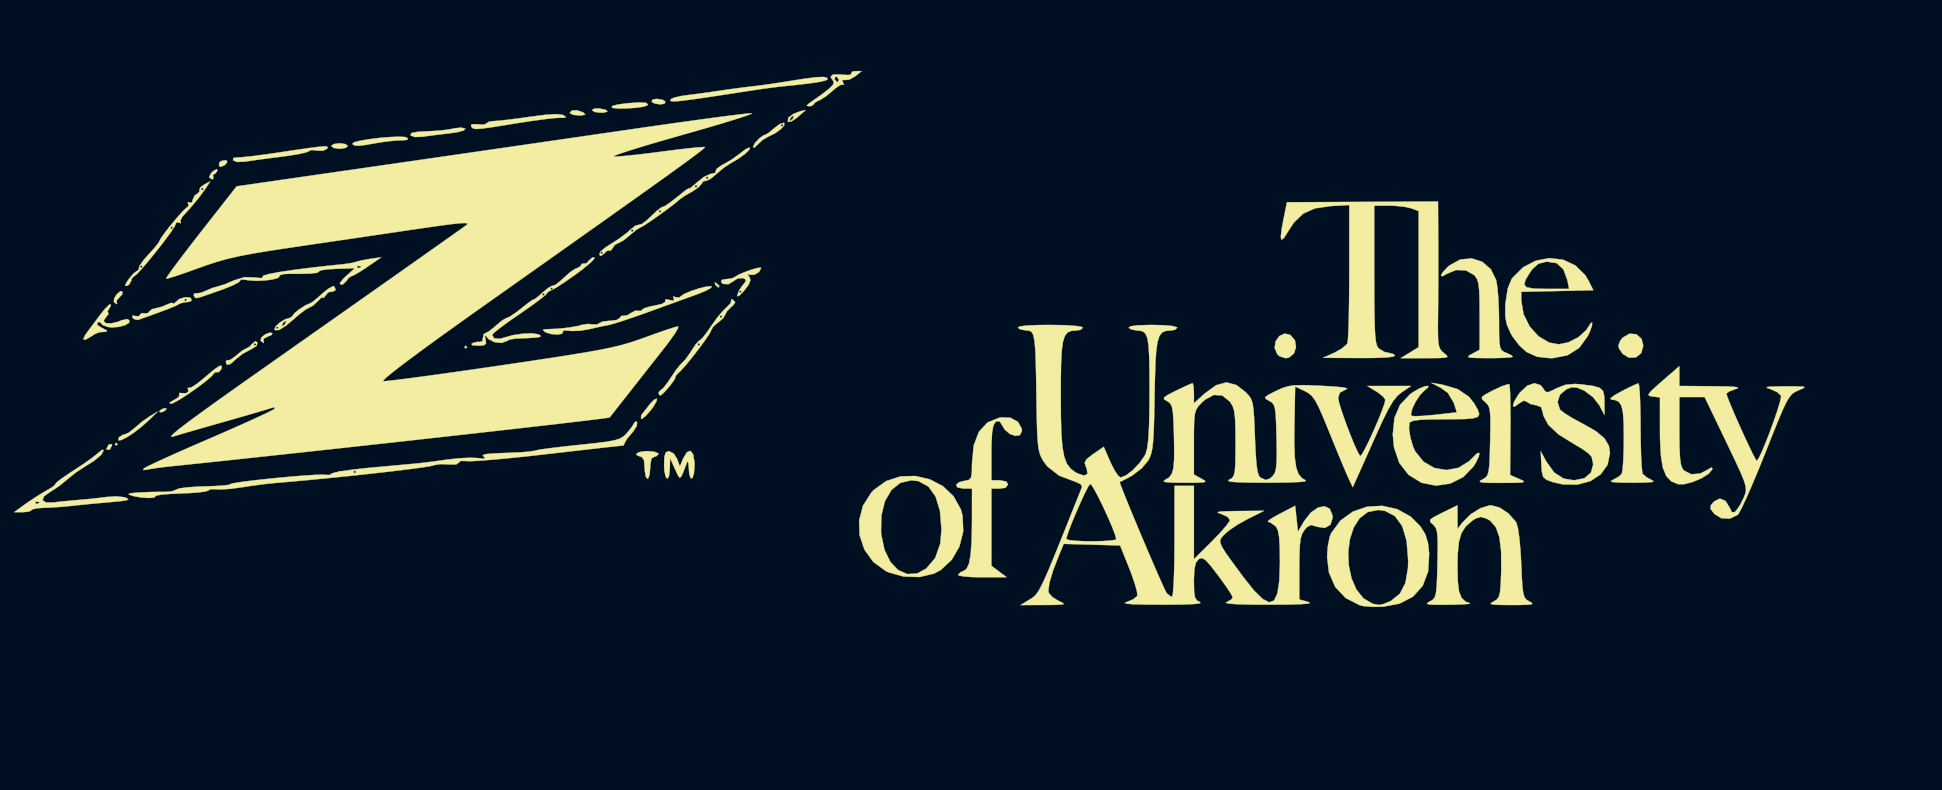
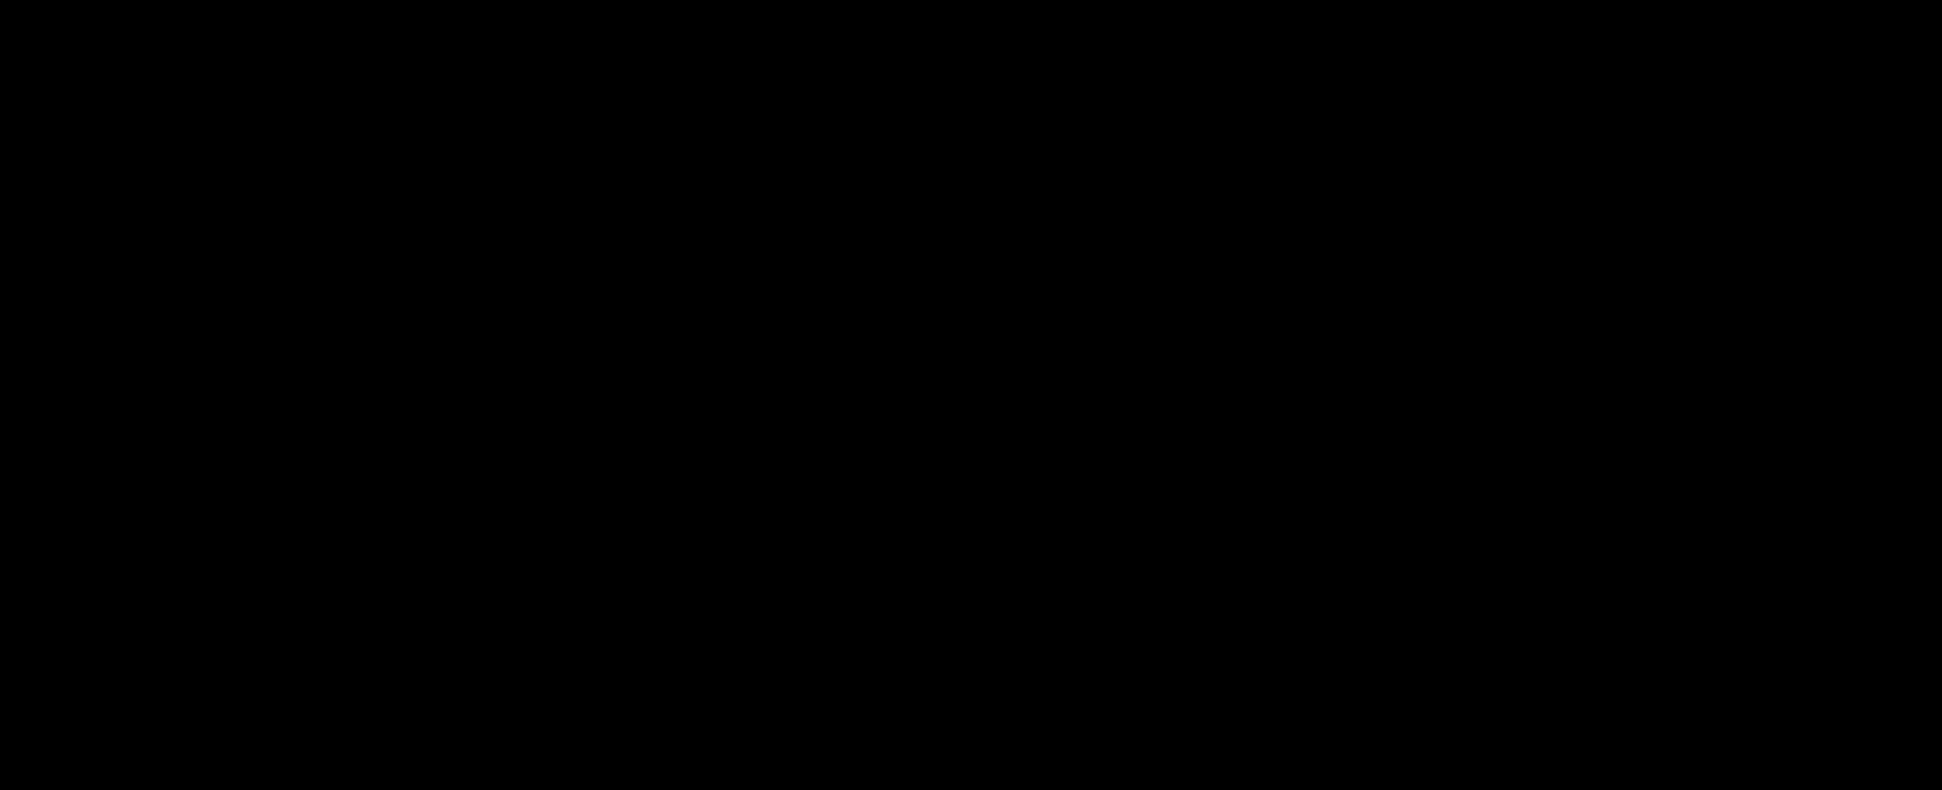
drawing: [13, 70, 1805, 608] -> none

